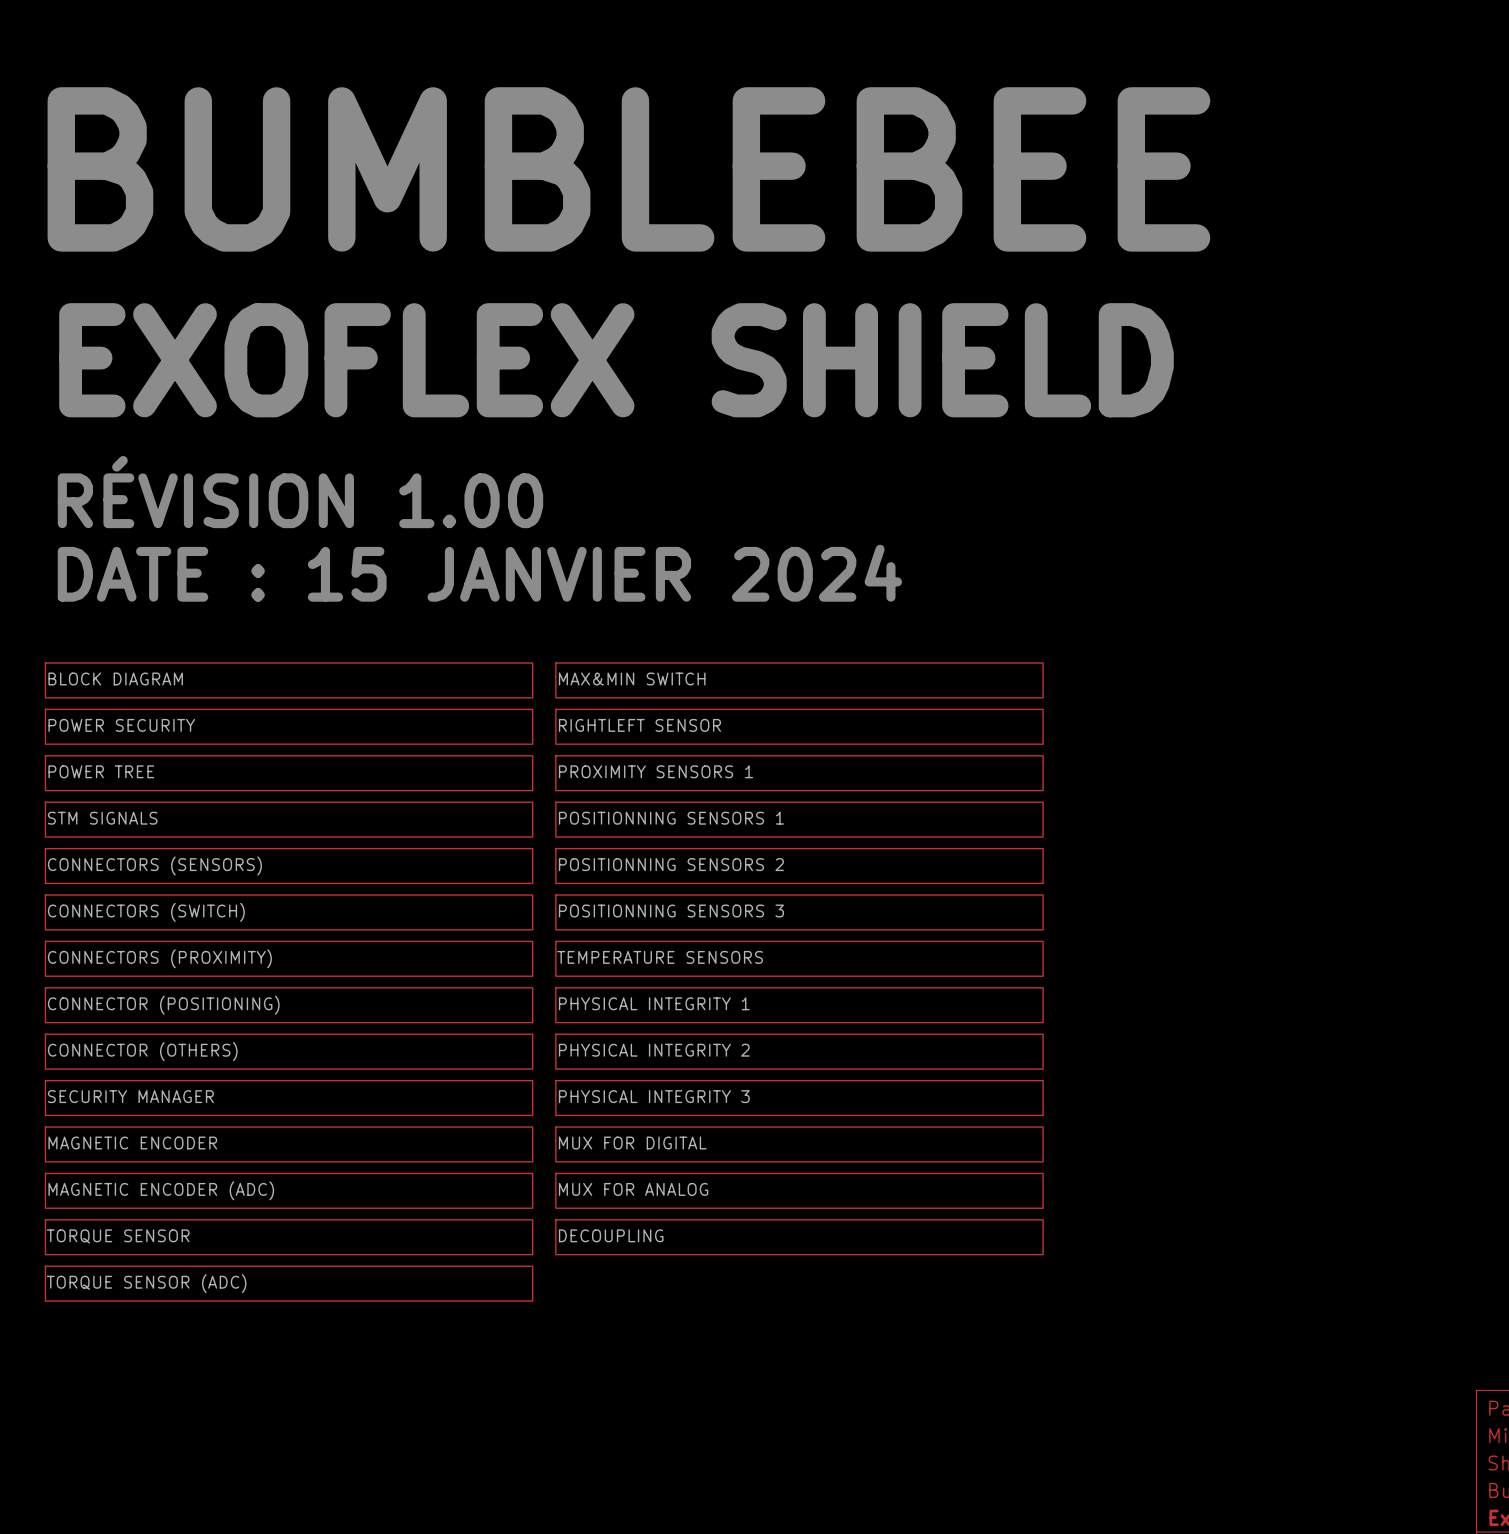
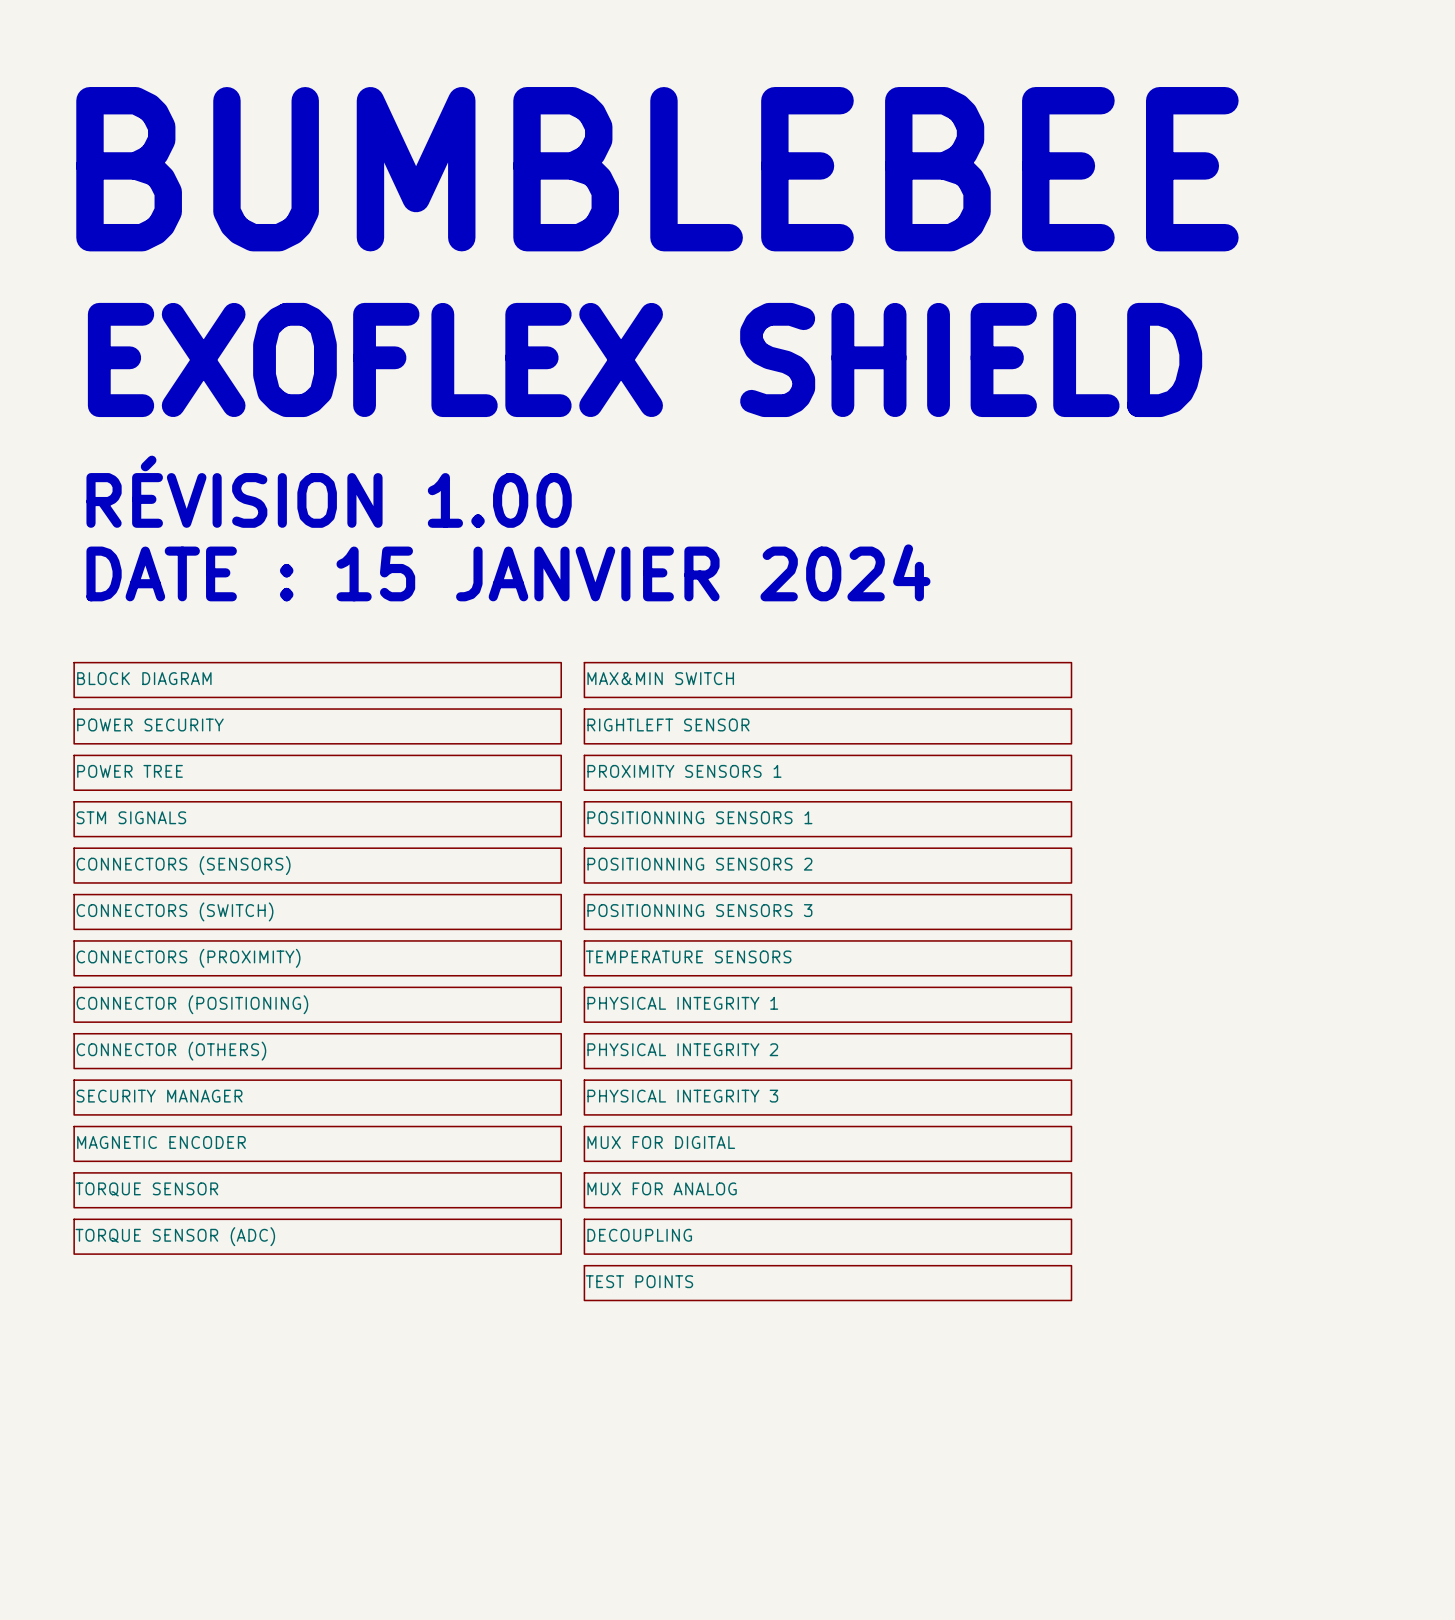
sheet MAGNETIC ENCODER (ADC) name: MAGNETIC ENCODER (ADC) (161, 1190) -> TORQUE SENSOR (146, 1189)
sheet TORQUE SENSOR name: TORQUE SENSOR (118, 1236) -> TORQUE SENSOR (ADC) (175, 1236)
sheet TORQUE SENSOR (ADC): (289, 1283) -> none
sheet TEST POINTS: none -> (827, 1283)

